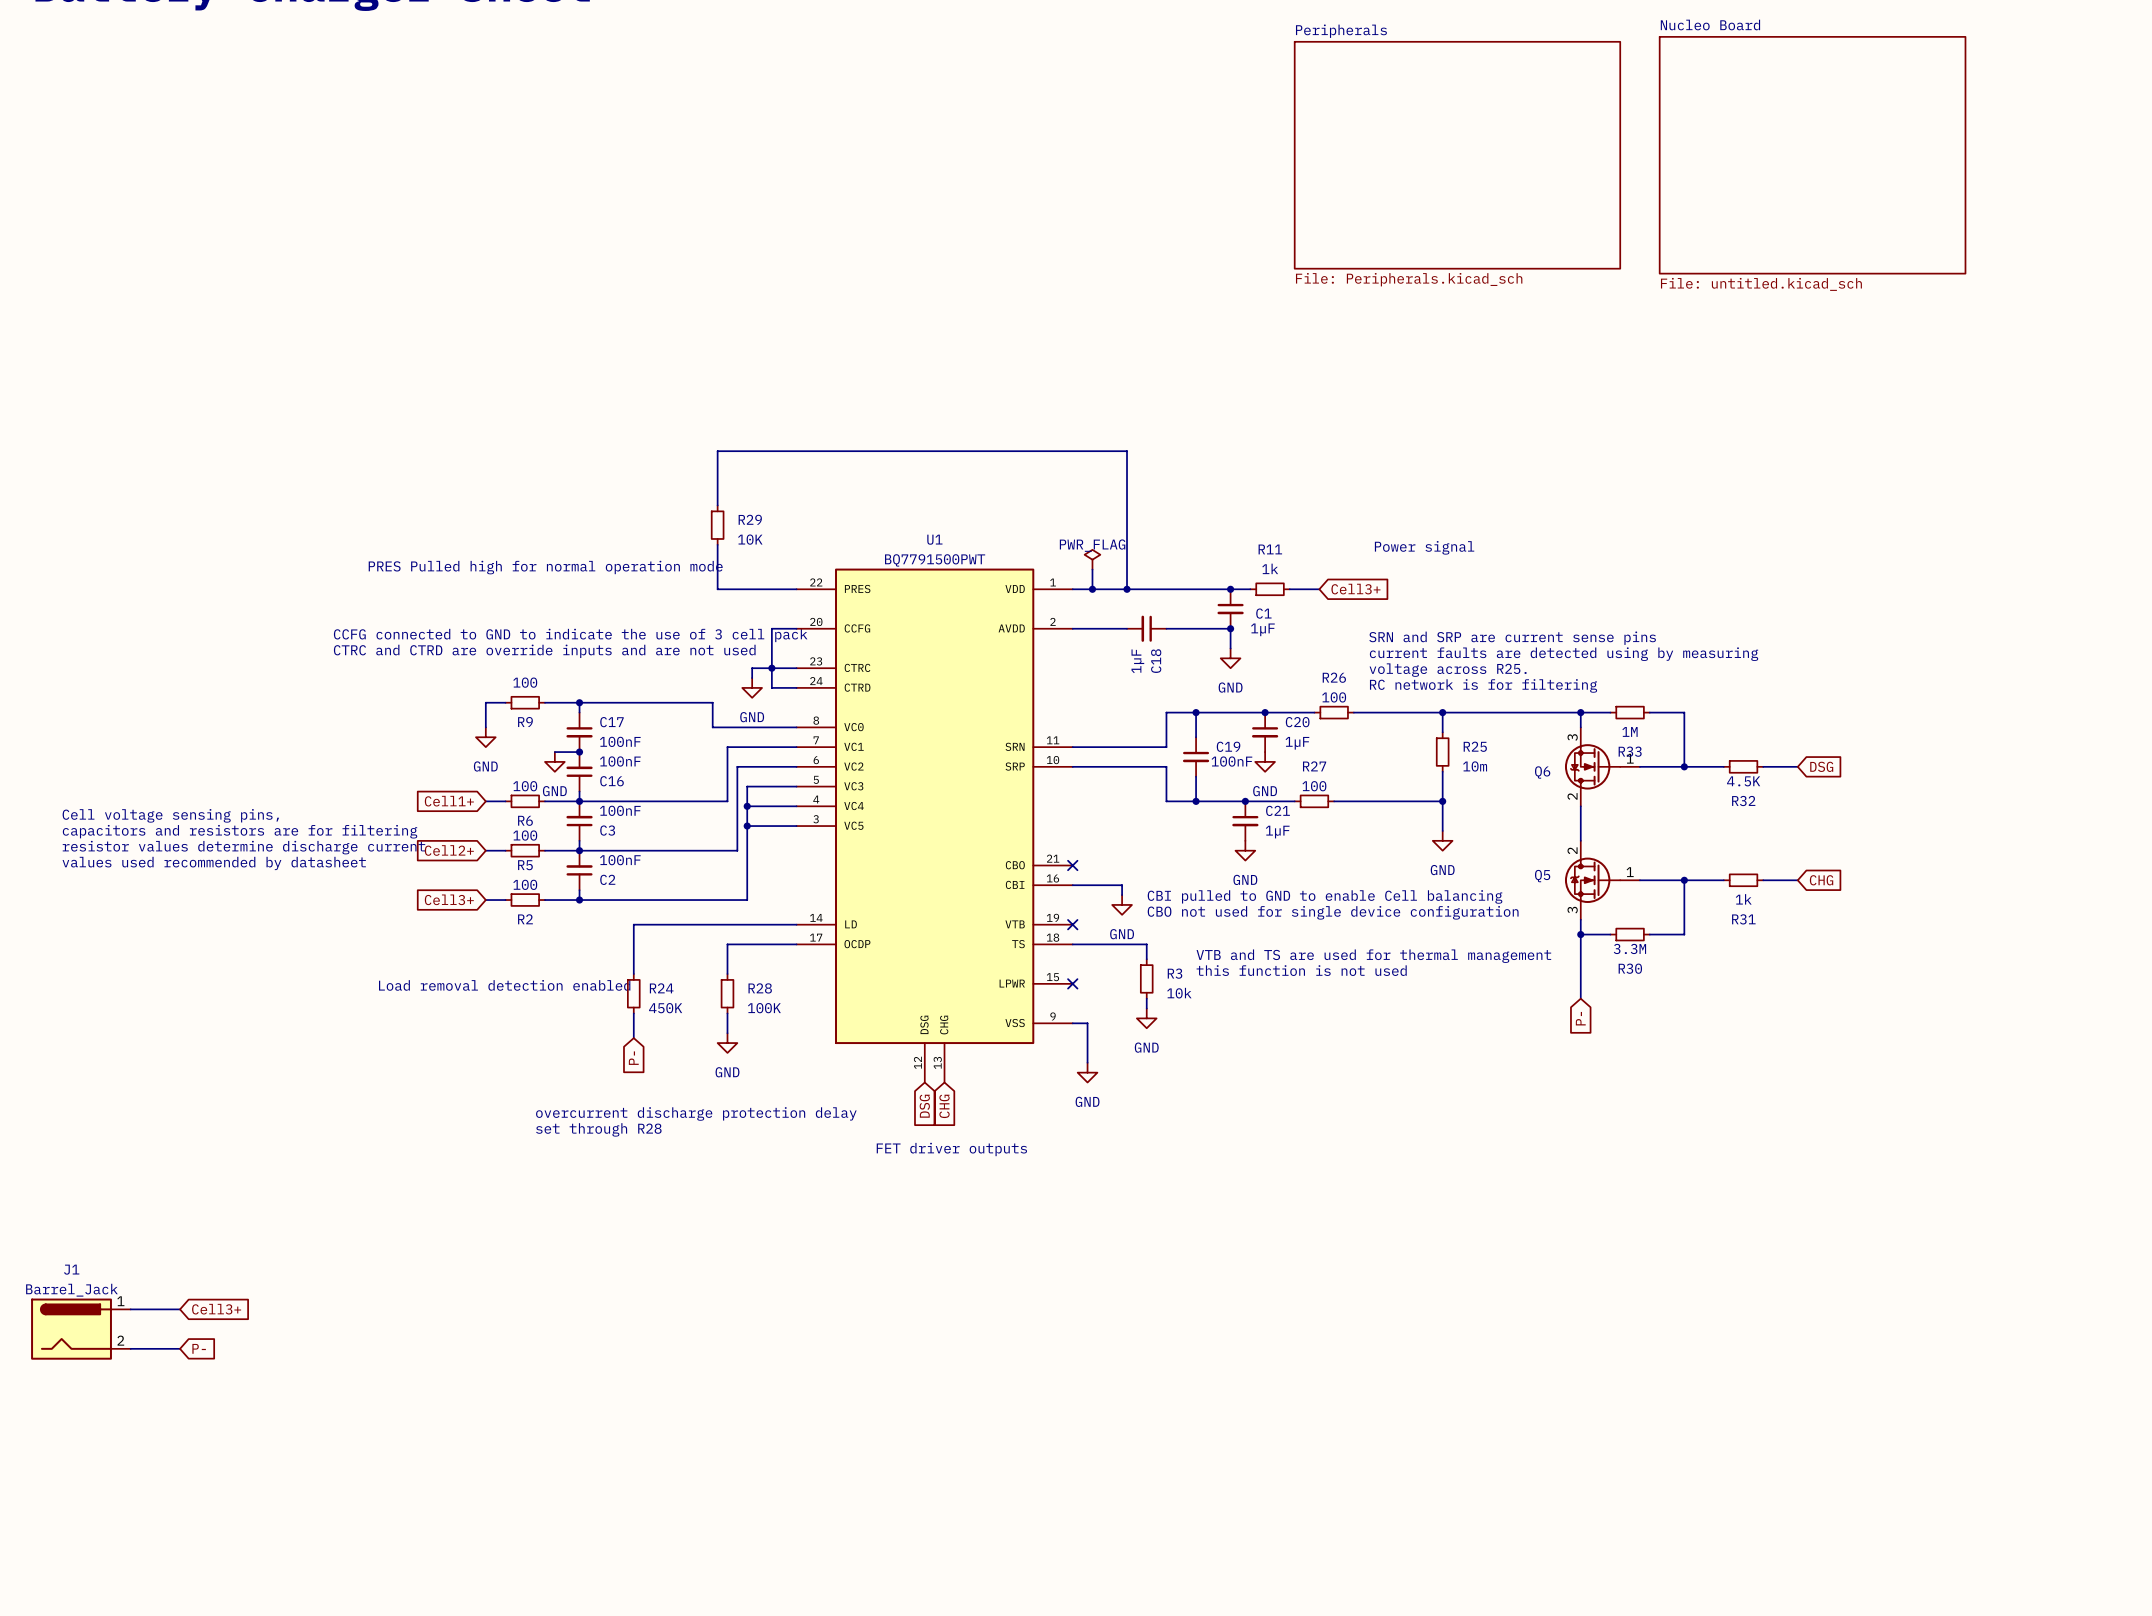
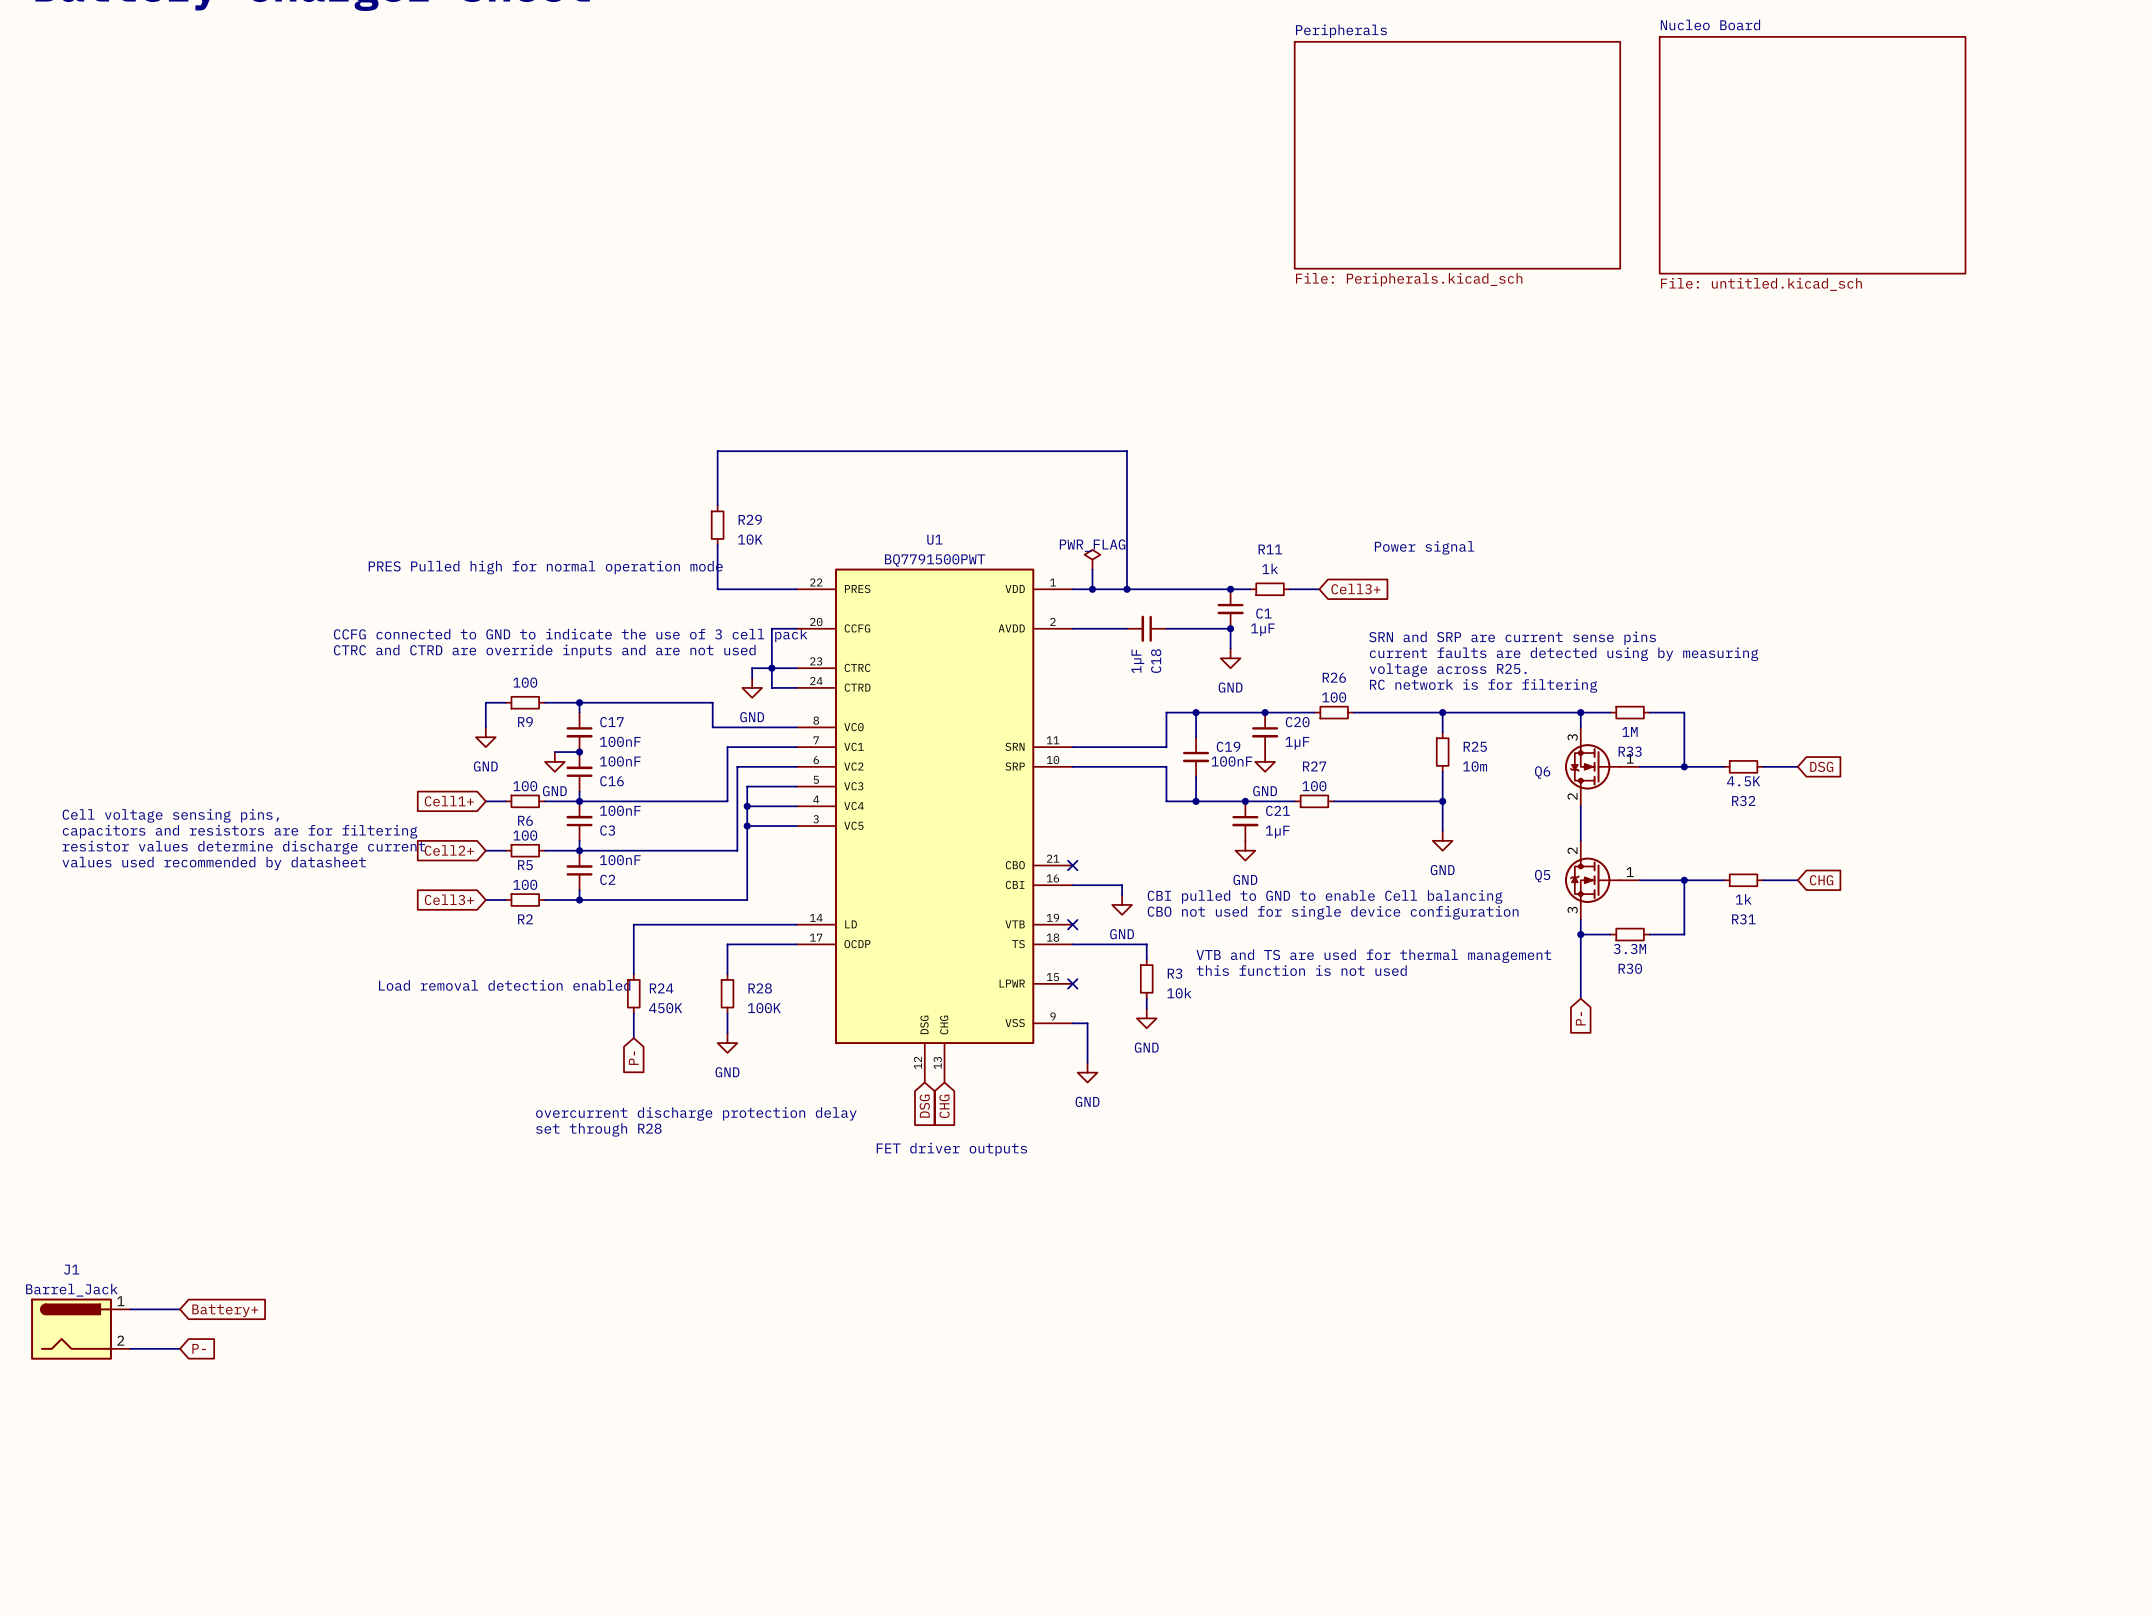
global label: Cell3+ (216, 1309) -> Battery+ (225, 1310)

